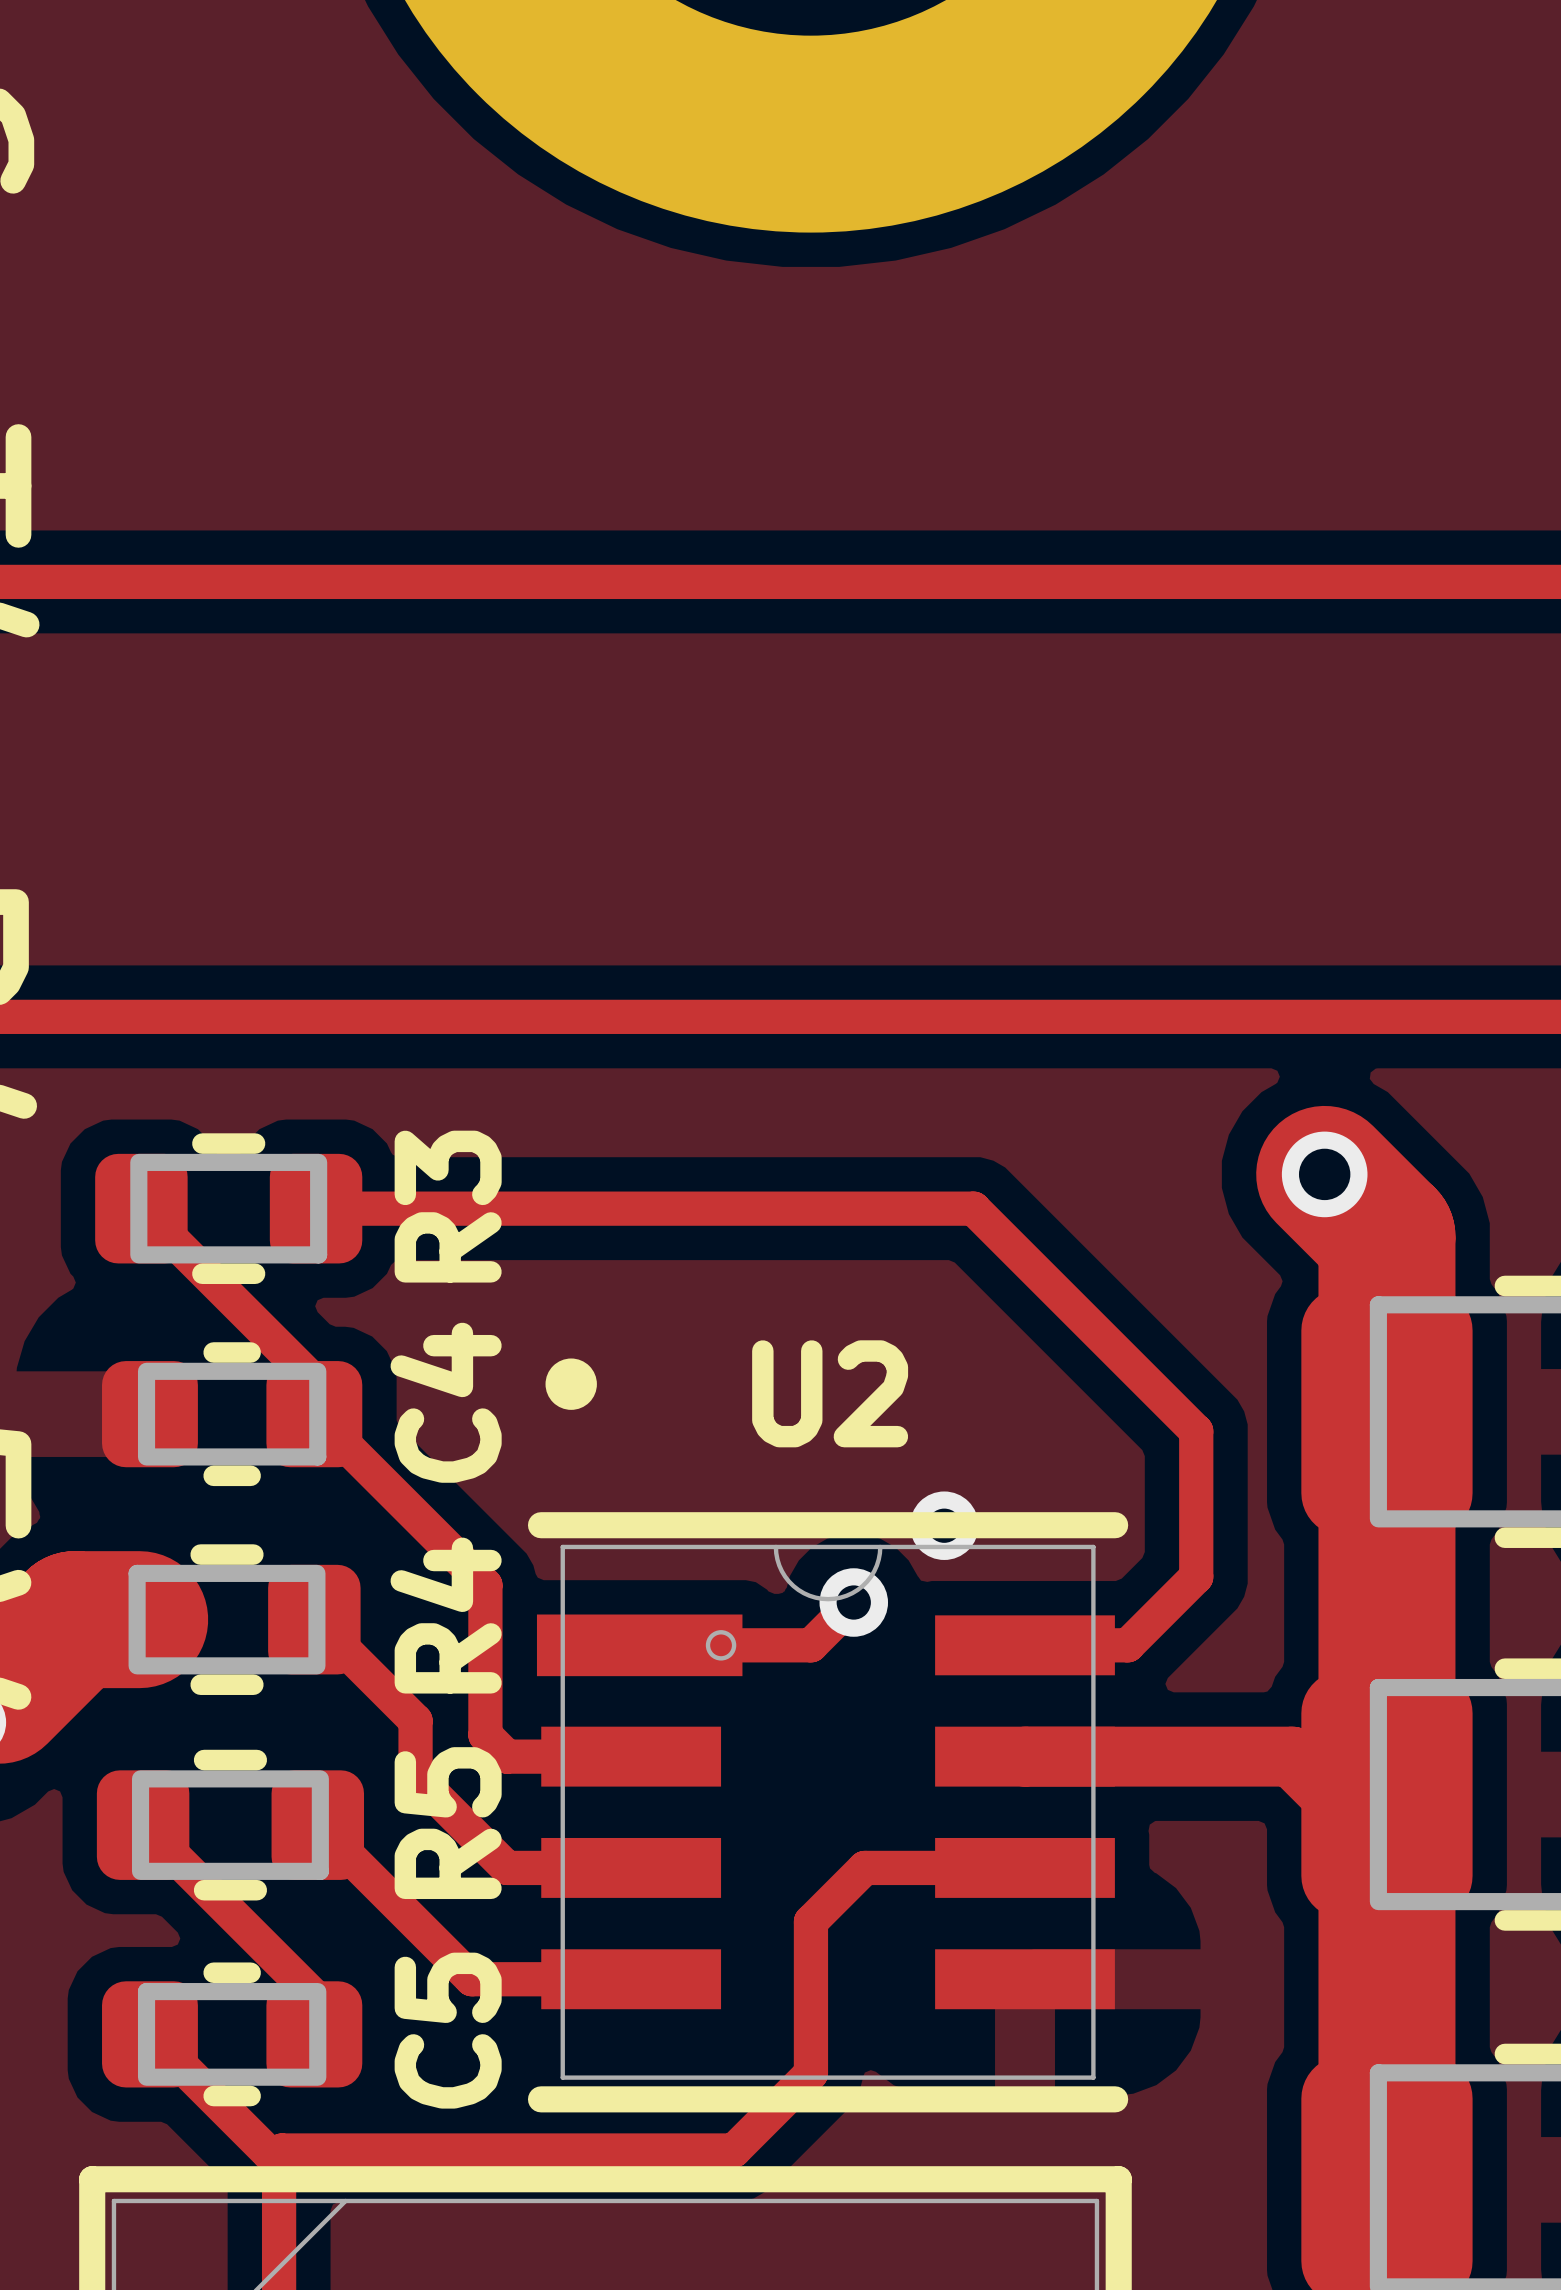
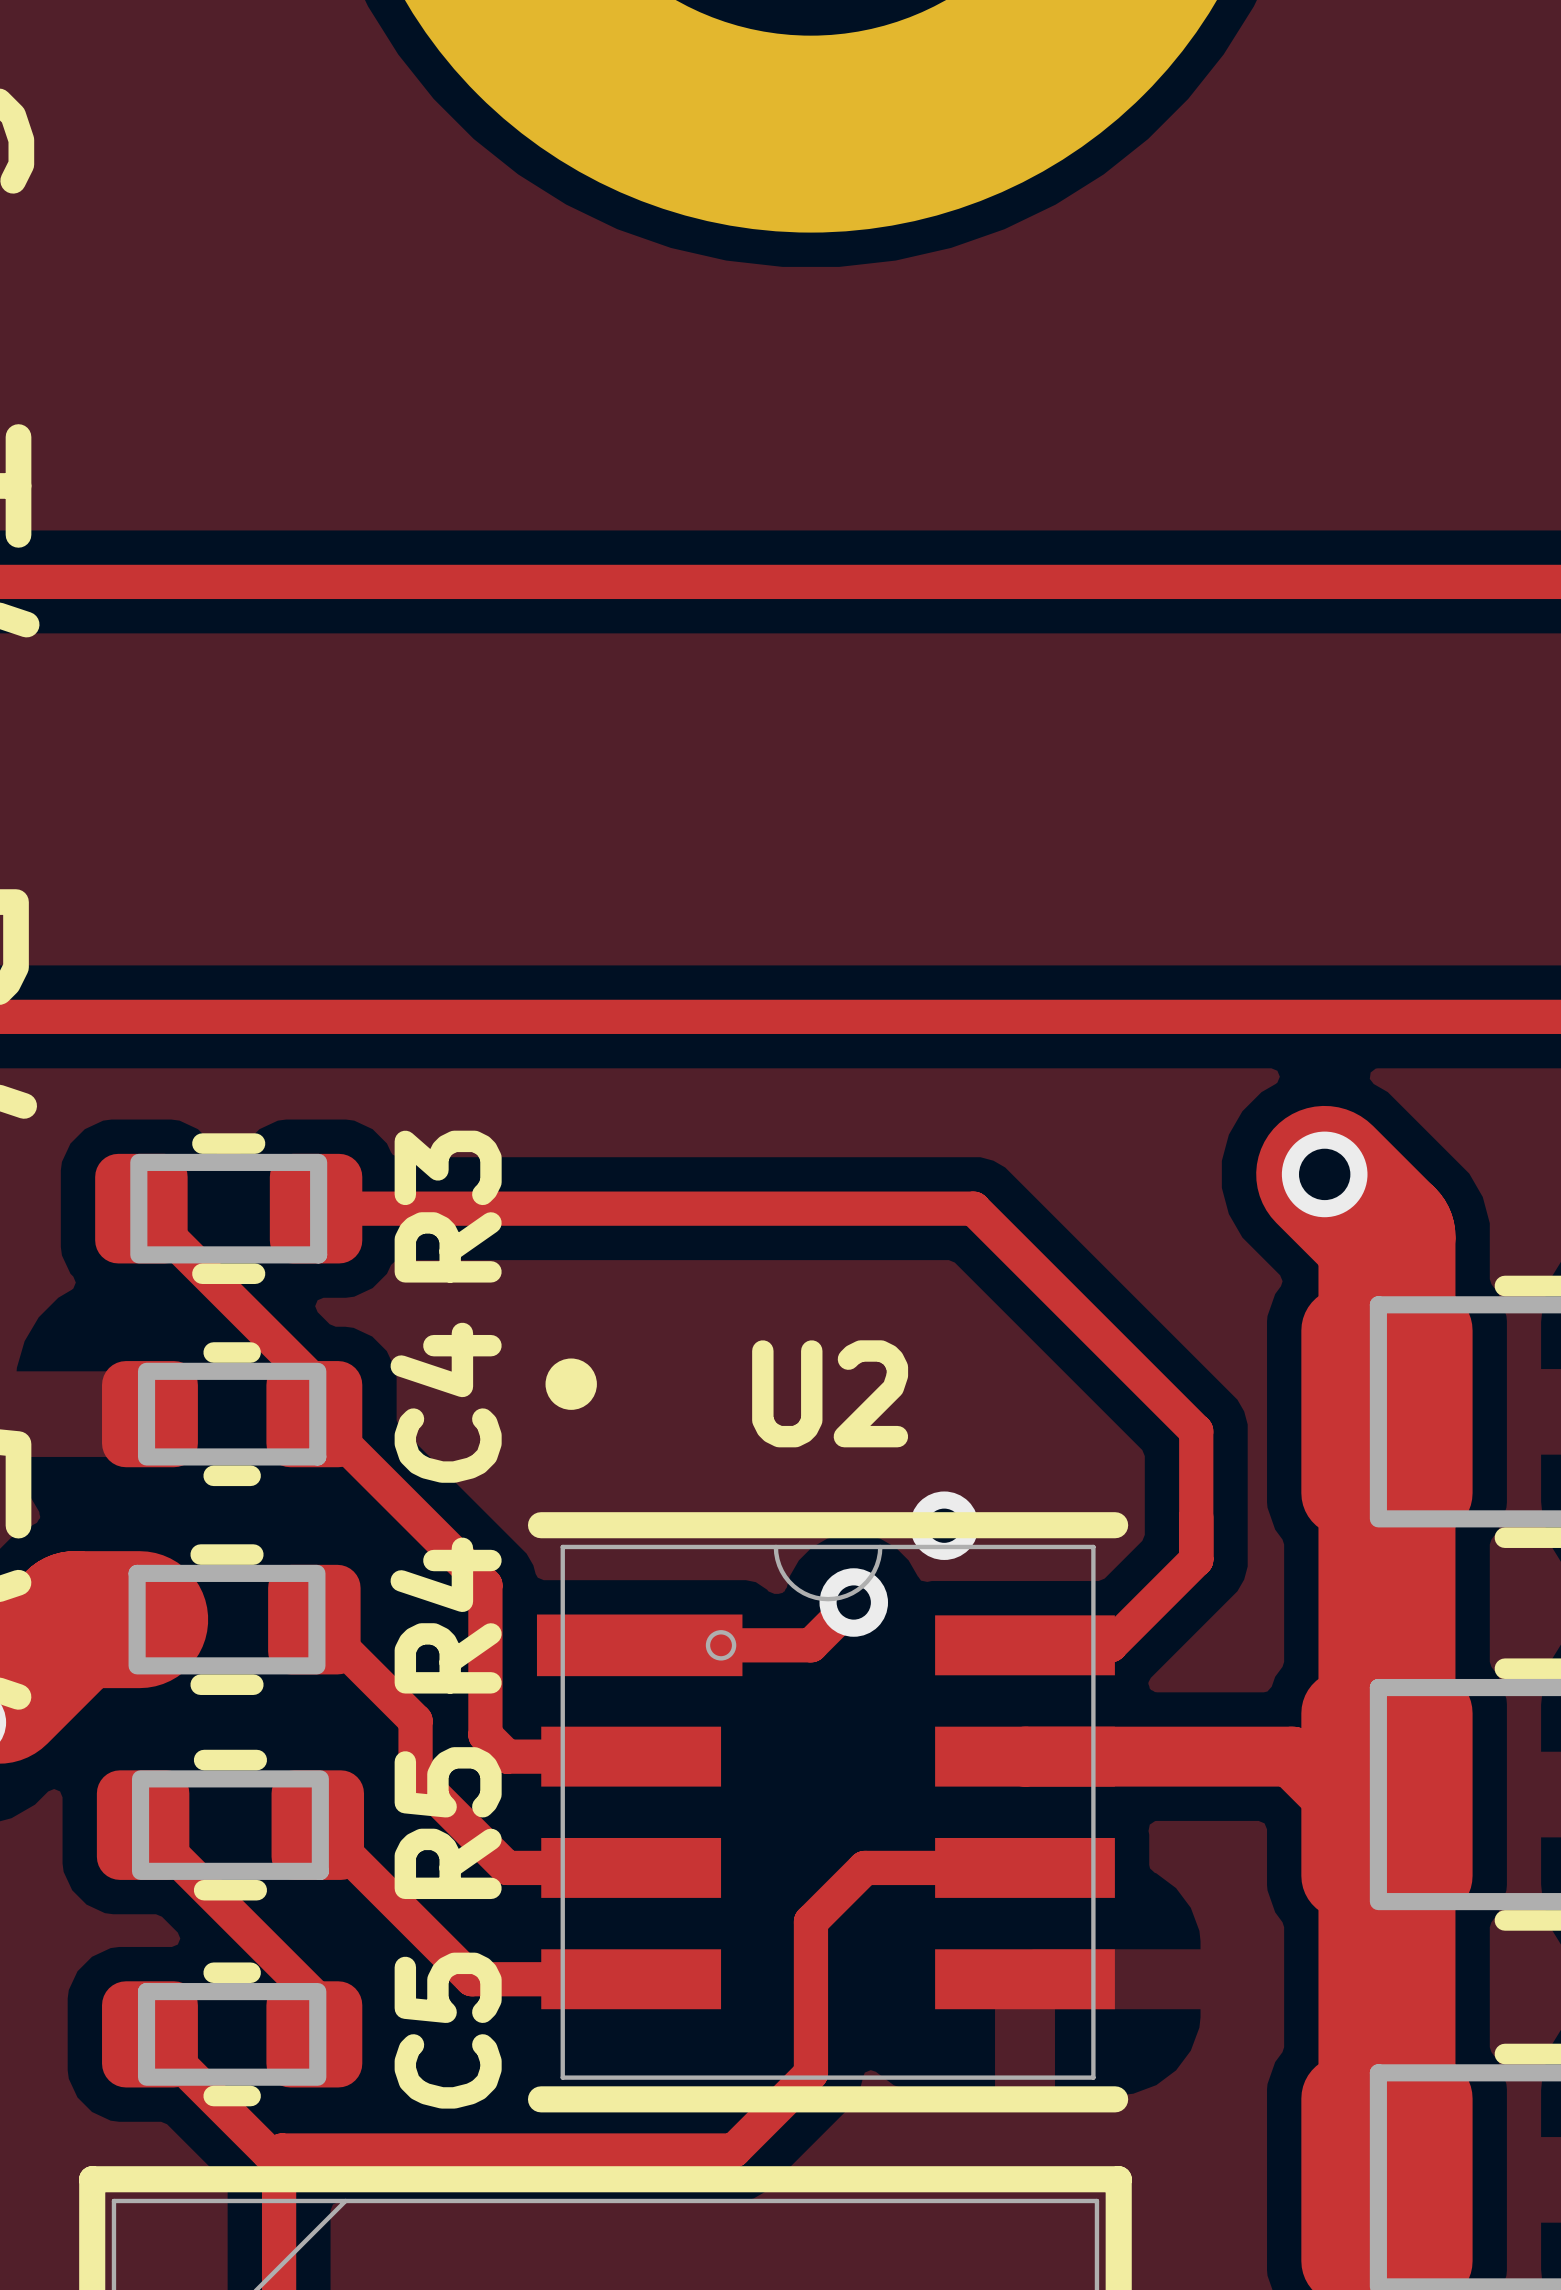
track: (1196, 1559) (1196, 1576) (1127, 1645) (1110, 1645) -> (1196, 1559) (1110, 1645)

